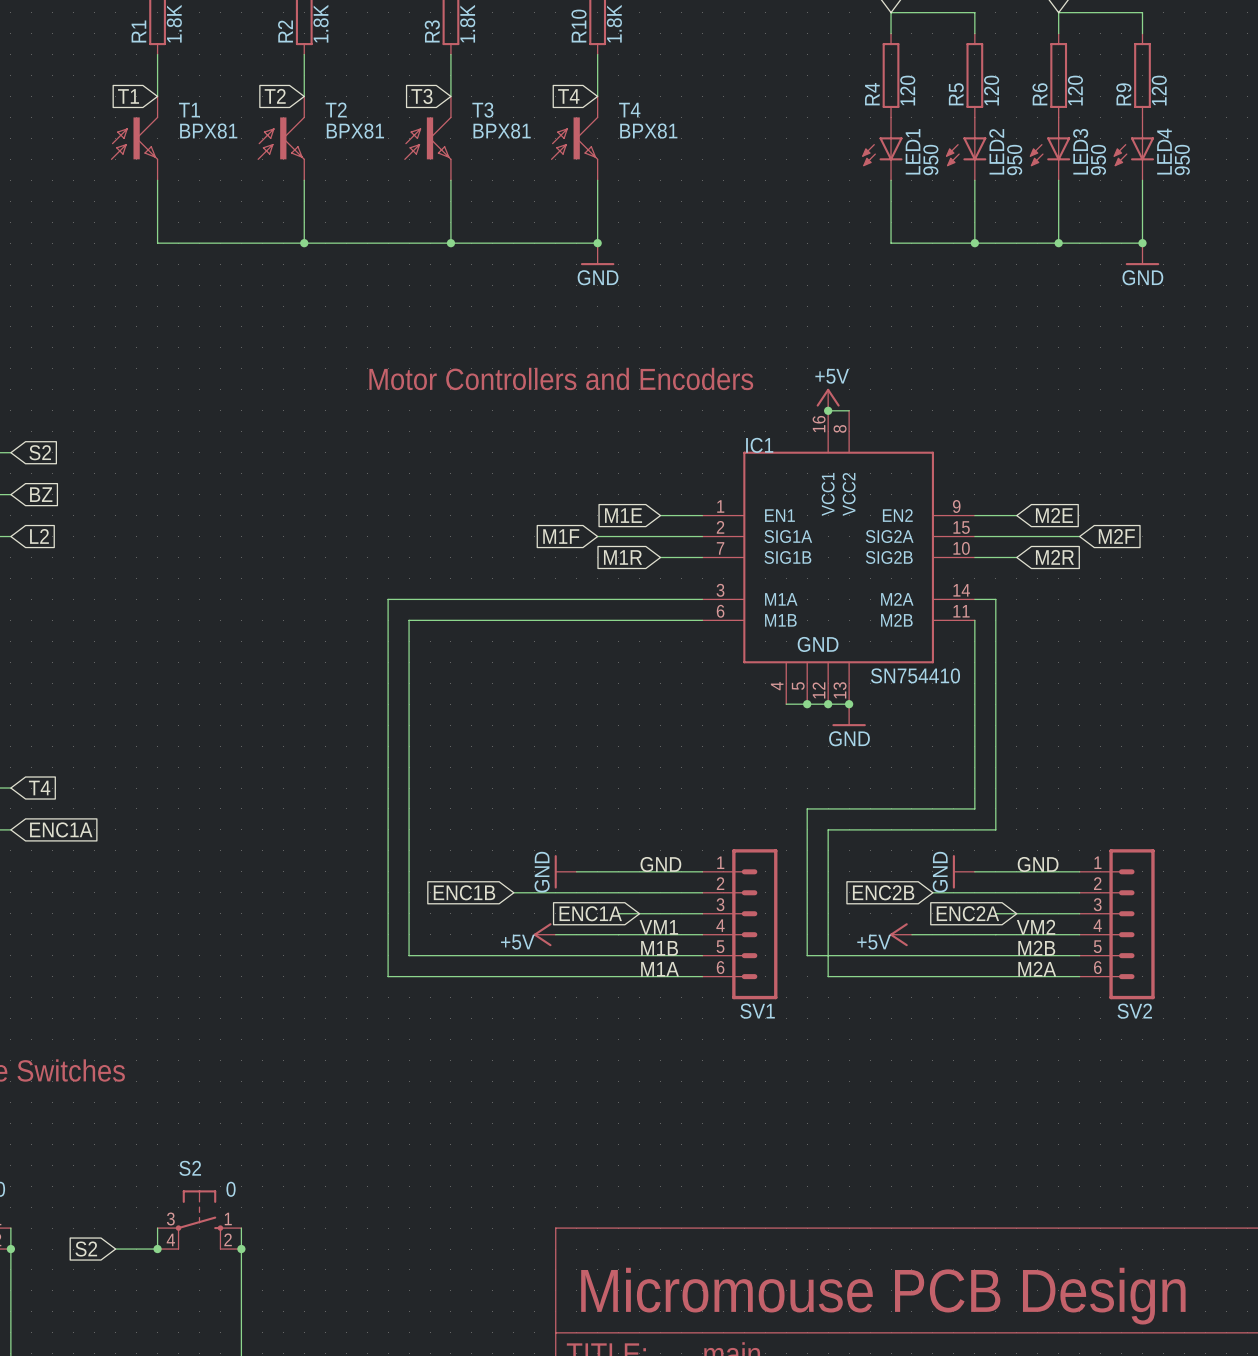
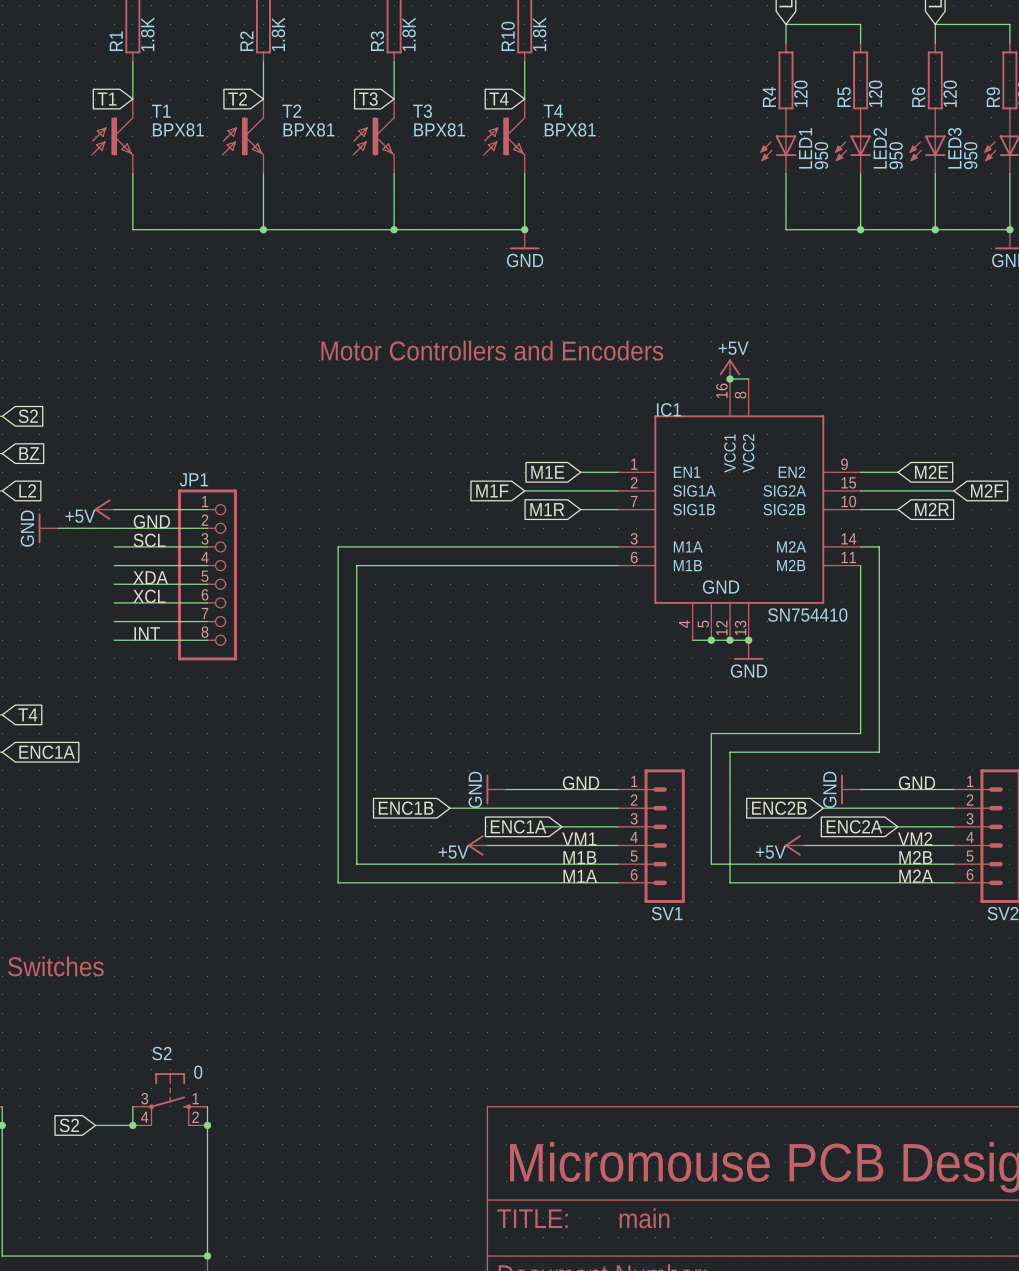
power symbol: none -> +5V (104, 509)
wire: none -> (114, 509) (207, 509)
label: none -> GND (151, 521)
power symbol: none -> GND (48, 528)
wire: none -> (58, 528) (207, 528)
label: none -> SCL (149, 540)
wire: none -> (114, 546) (207, 546)
wire: none -> (114, 565) (207, 565)
JP1: none -> (207, 574)
label: none -> XDA (150, 577)
wire: none -> (114, 584) (207, 584)
label: none -> XCL (149, 596)
wire: none -> (114, 602) (207, 602)
wire: none -> (114, 621) (207, 621)
label: none -> INT (147, 633)
wire: none -> (114, 640) (207, 640)

